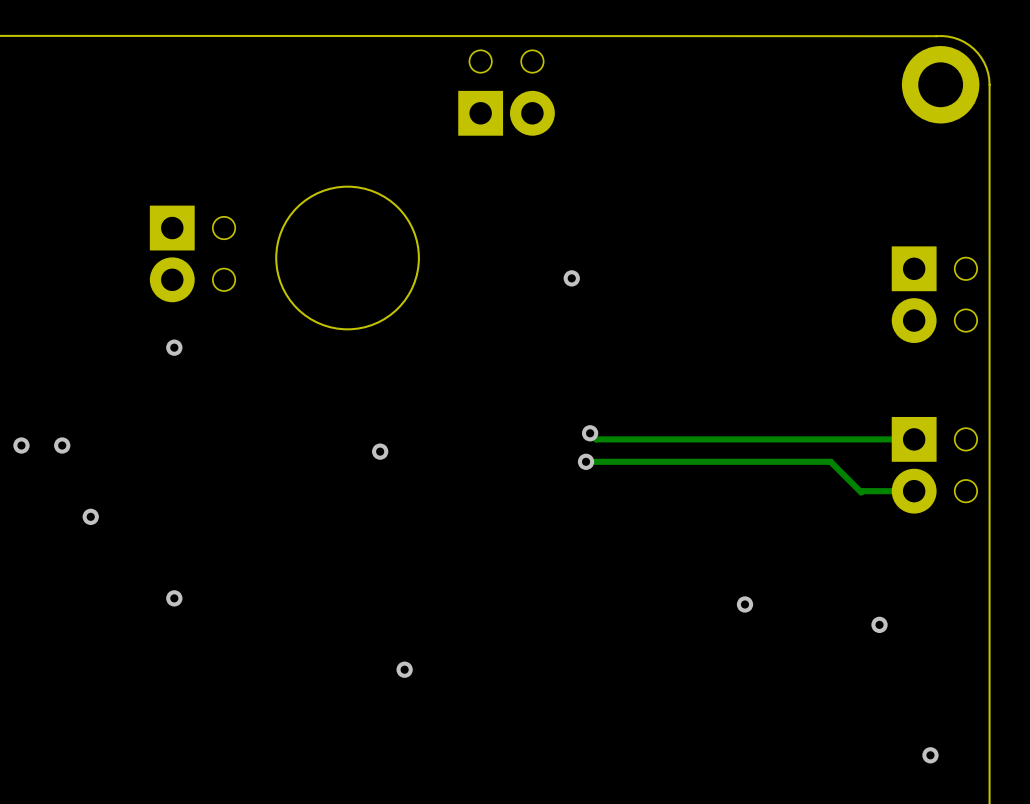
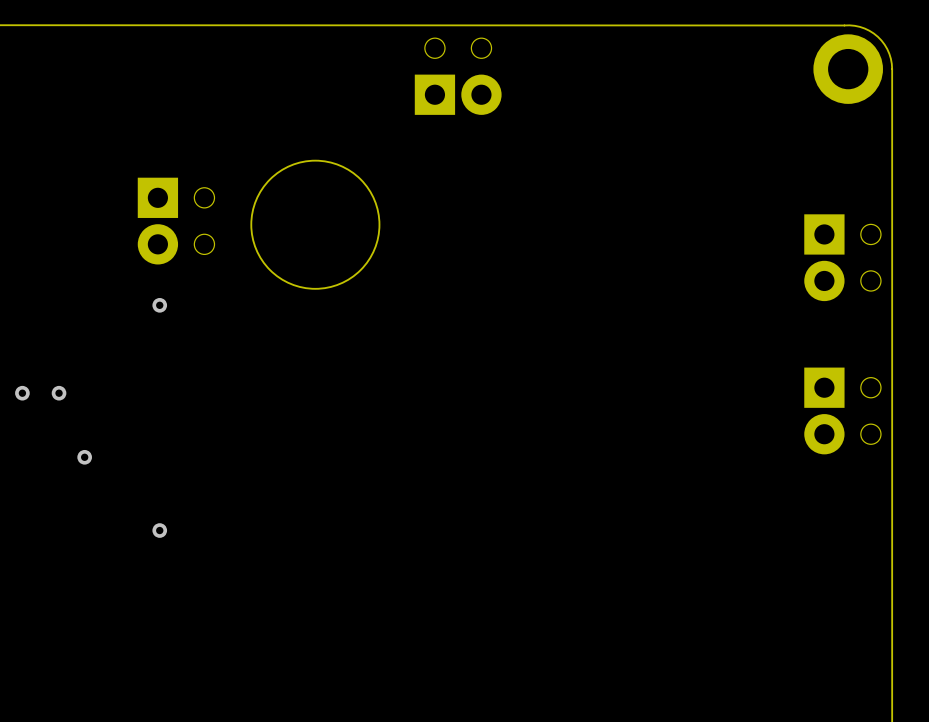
via: (571, 278) -> none
track: (590, 433) (596, 439) (914, 439) -> none
via: (590, 433) -> none
via: (380, 451) -> none
track: (586, 461) (830, 461) (861, 492) (914, 491) -> none
via: (586, 461) -> none
via: (745, 604) -> none
via: (879, 624) -> none
via: (404, 669) -> none
via: (930, 755) -> none

